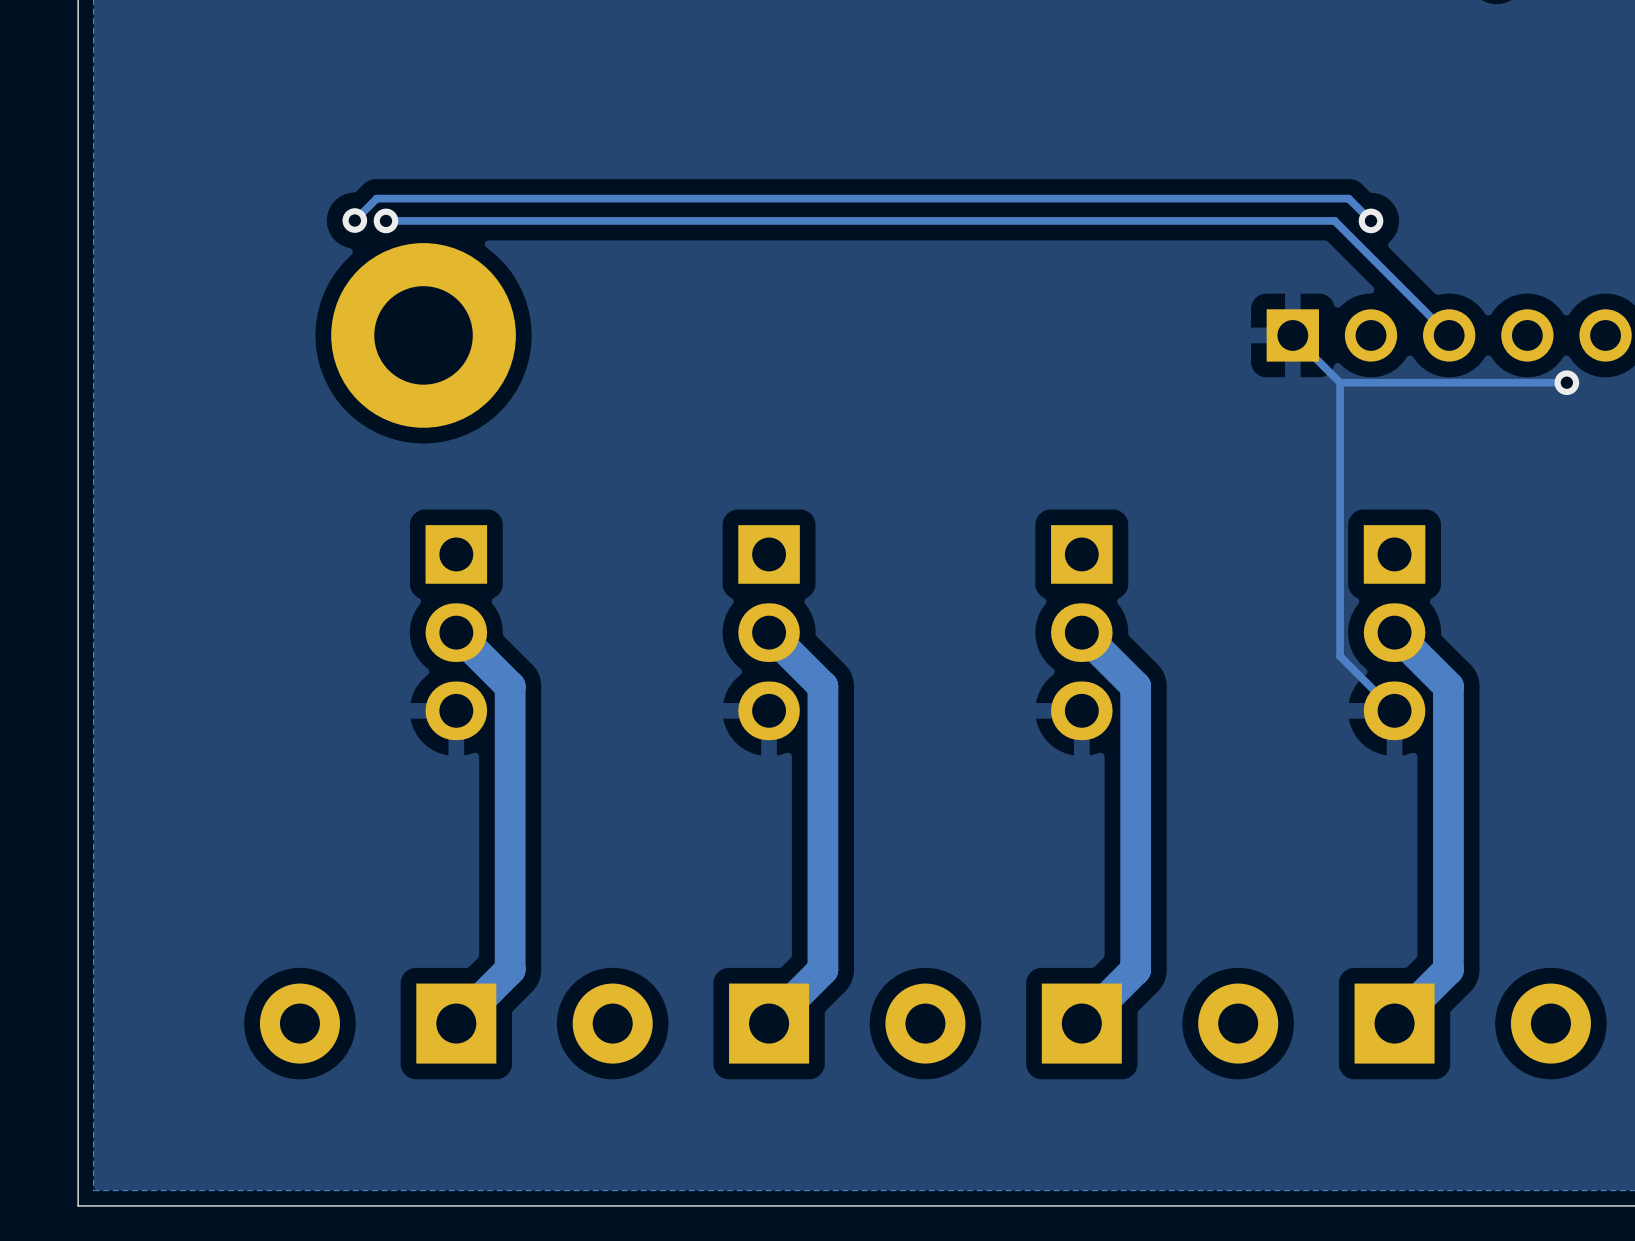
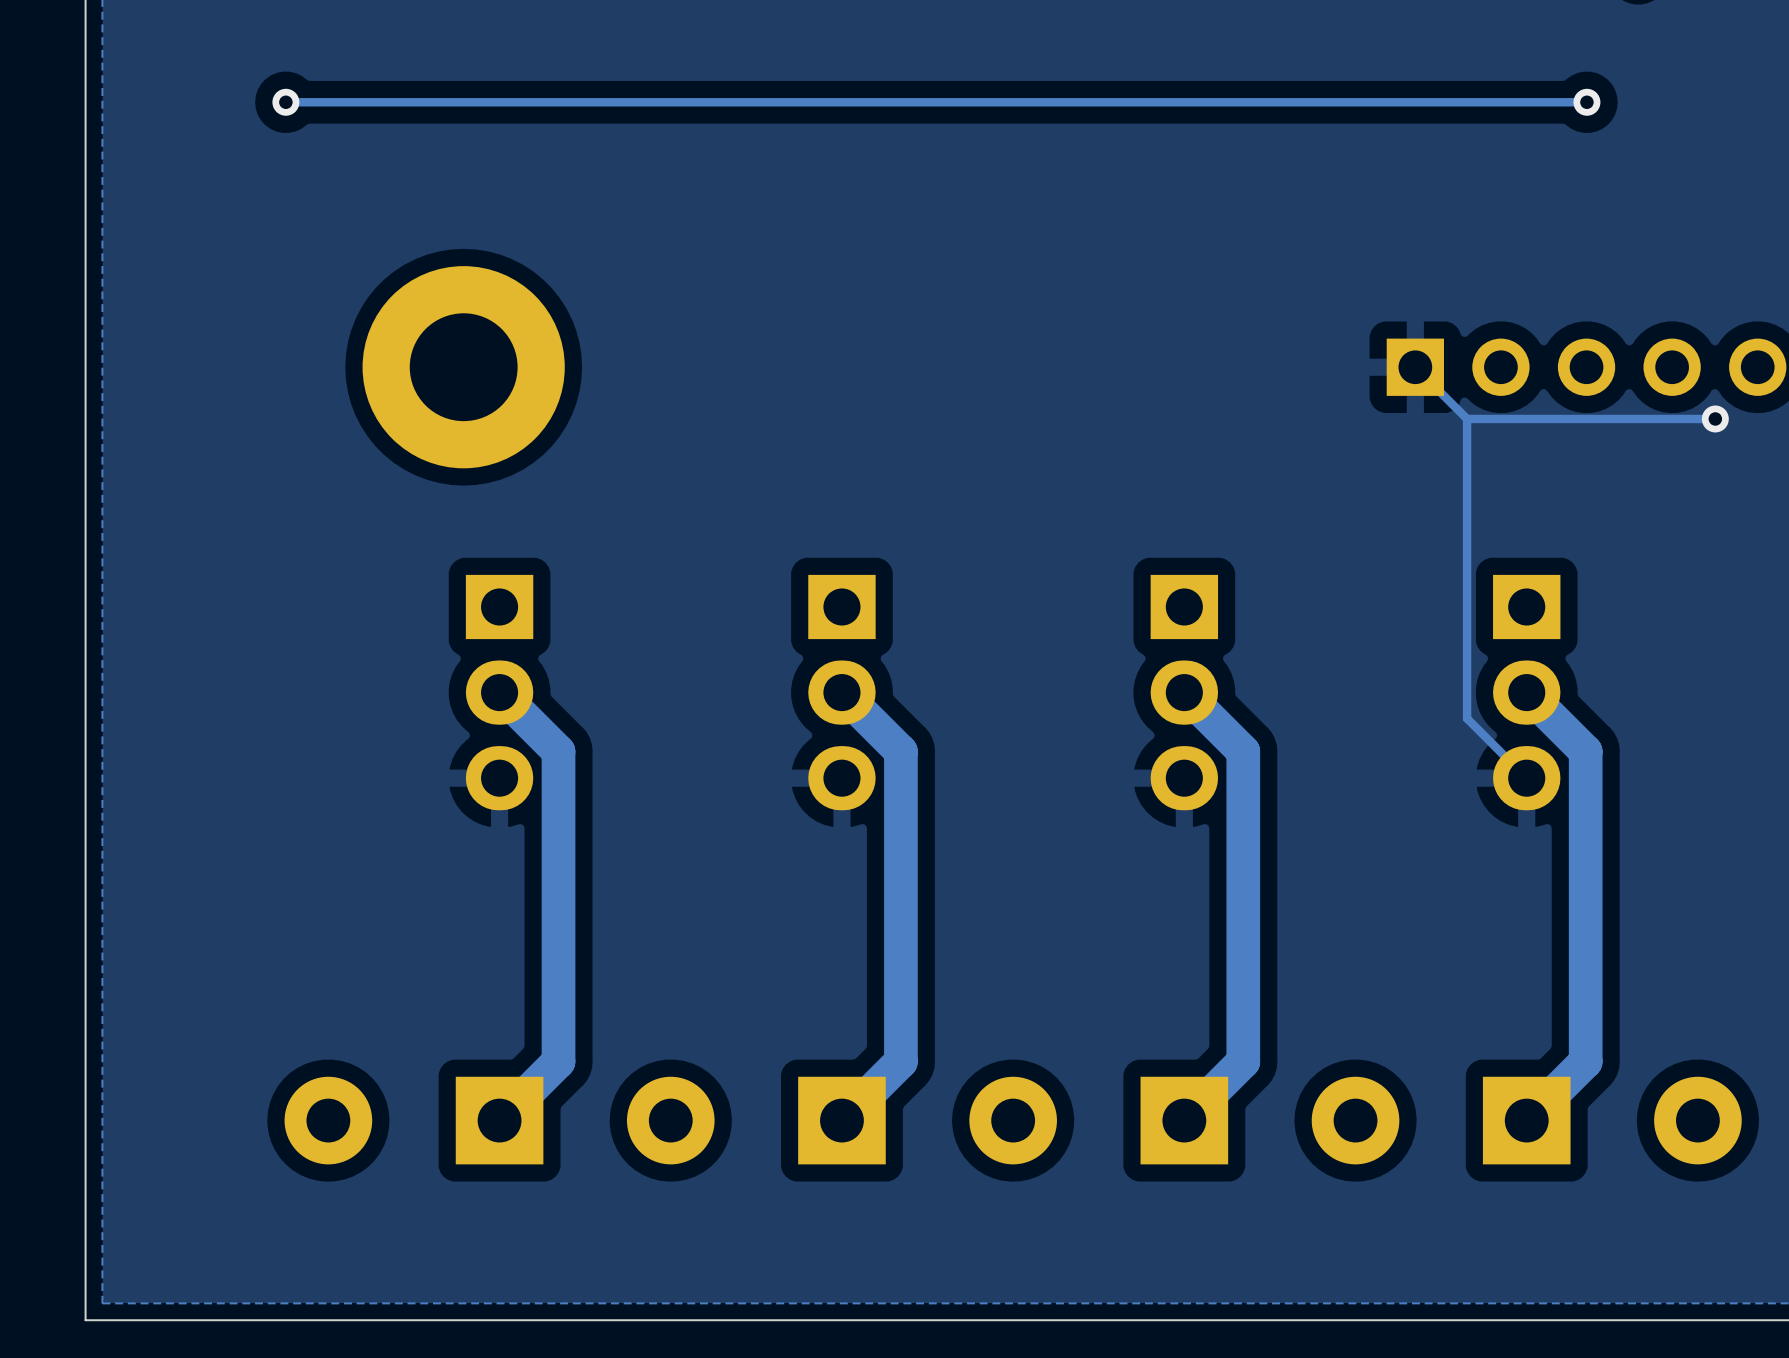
via: none -> (285, 102)
track: none -> (1586, 102) (285, 102)
via: (354, 220) -> none
track: (385, 220) (1334, 220) (1449, 335) -> none
via: (385, 220) -> none
track: (1371, 220) (1348, 198) (376, 198) (355, 220) -> none
via position: (1371, 220) -> (1586, 102)

